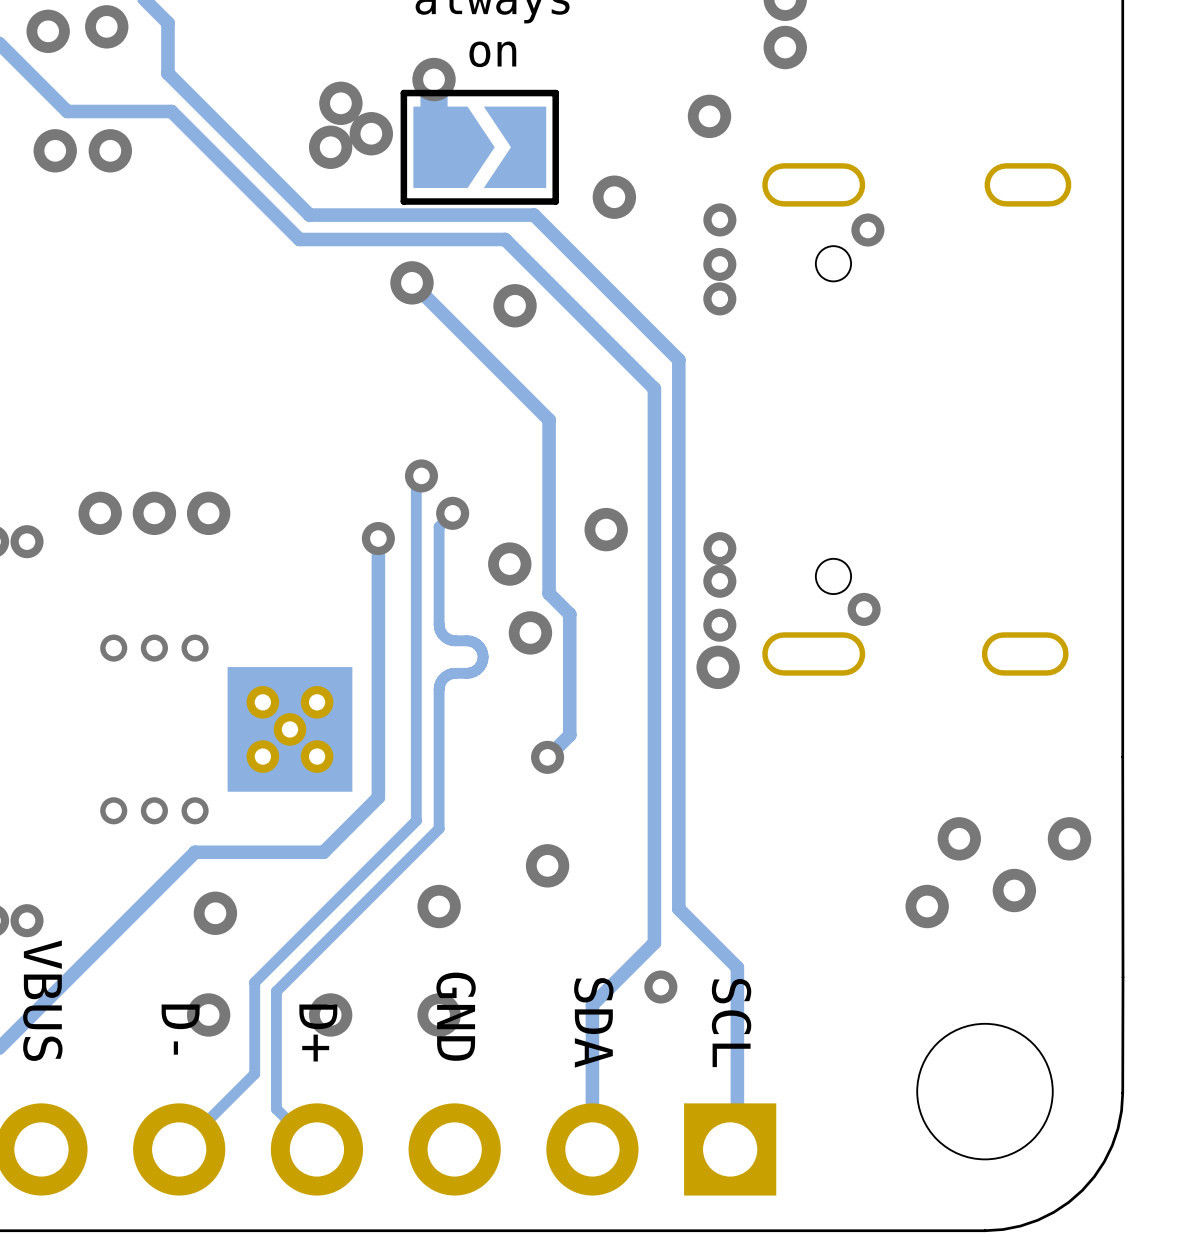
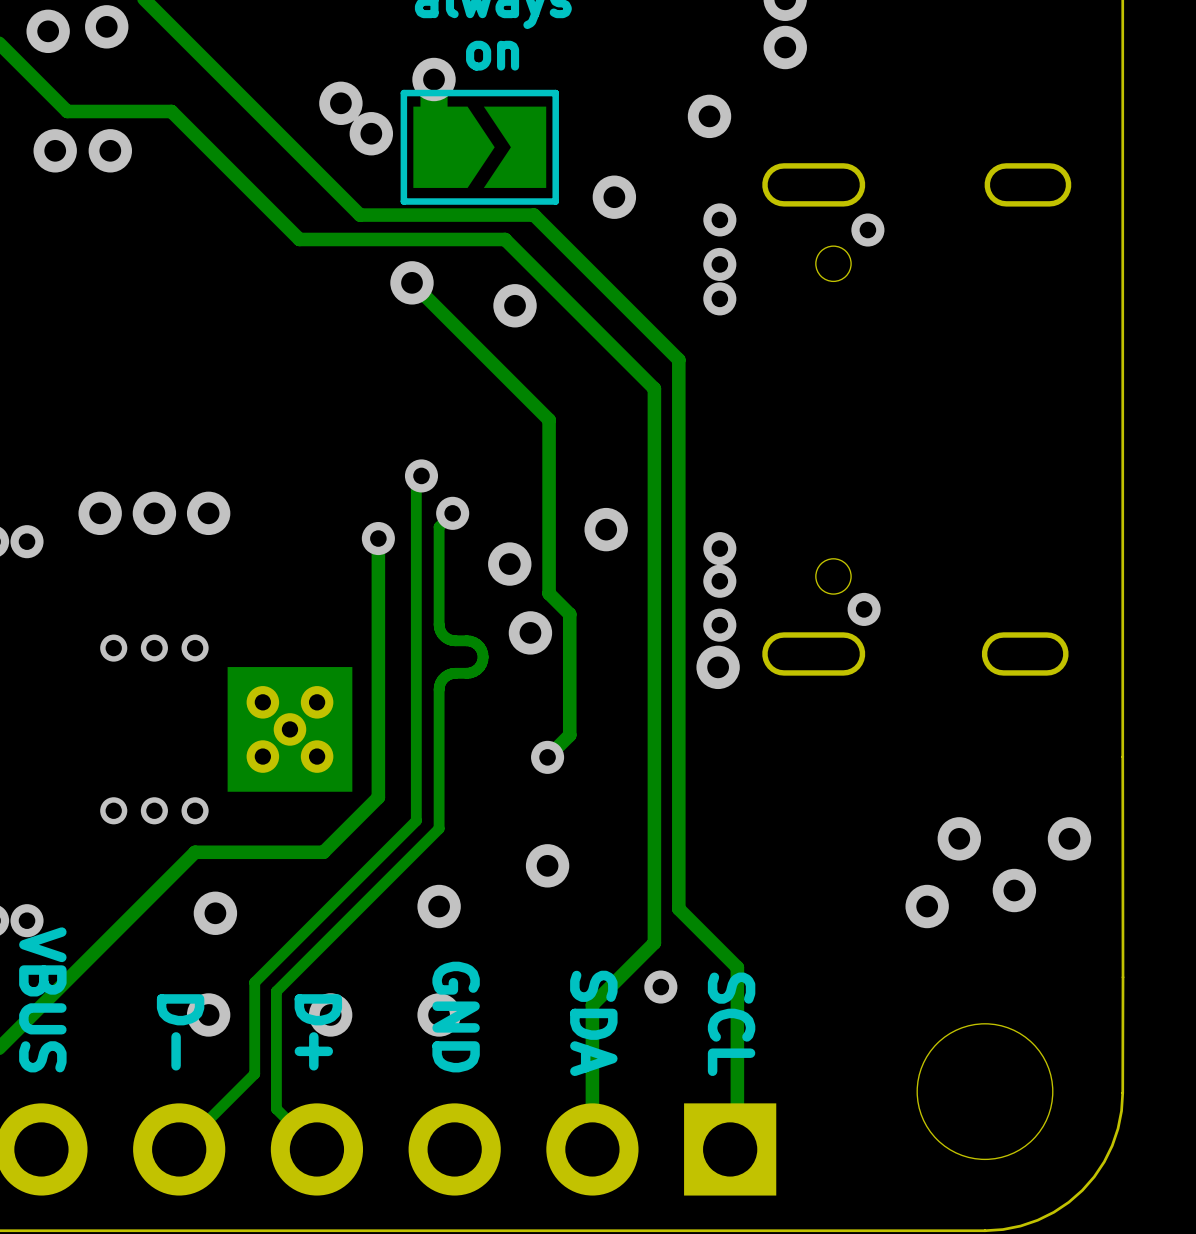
track: (167, 22) (167, 73) (309, 215) (360, 215) -> (167, 22) (360, 215)
via: (330, 147) -> none

